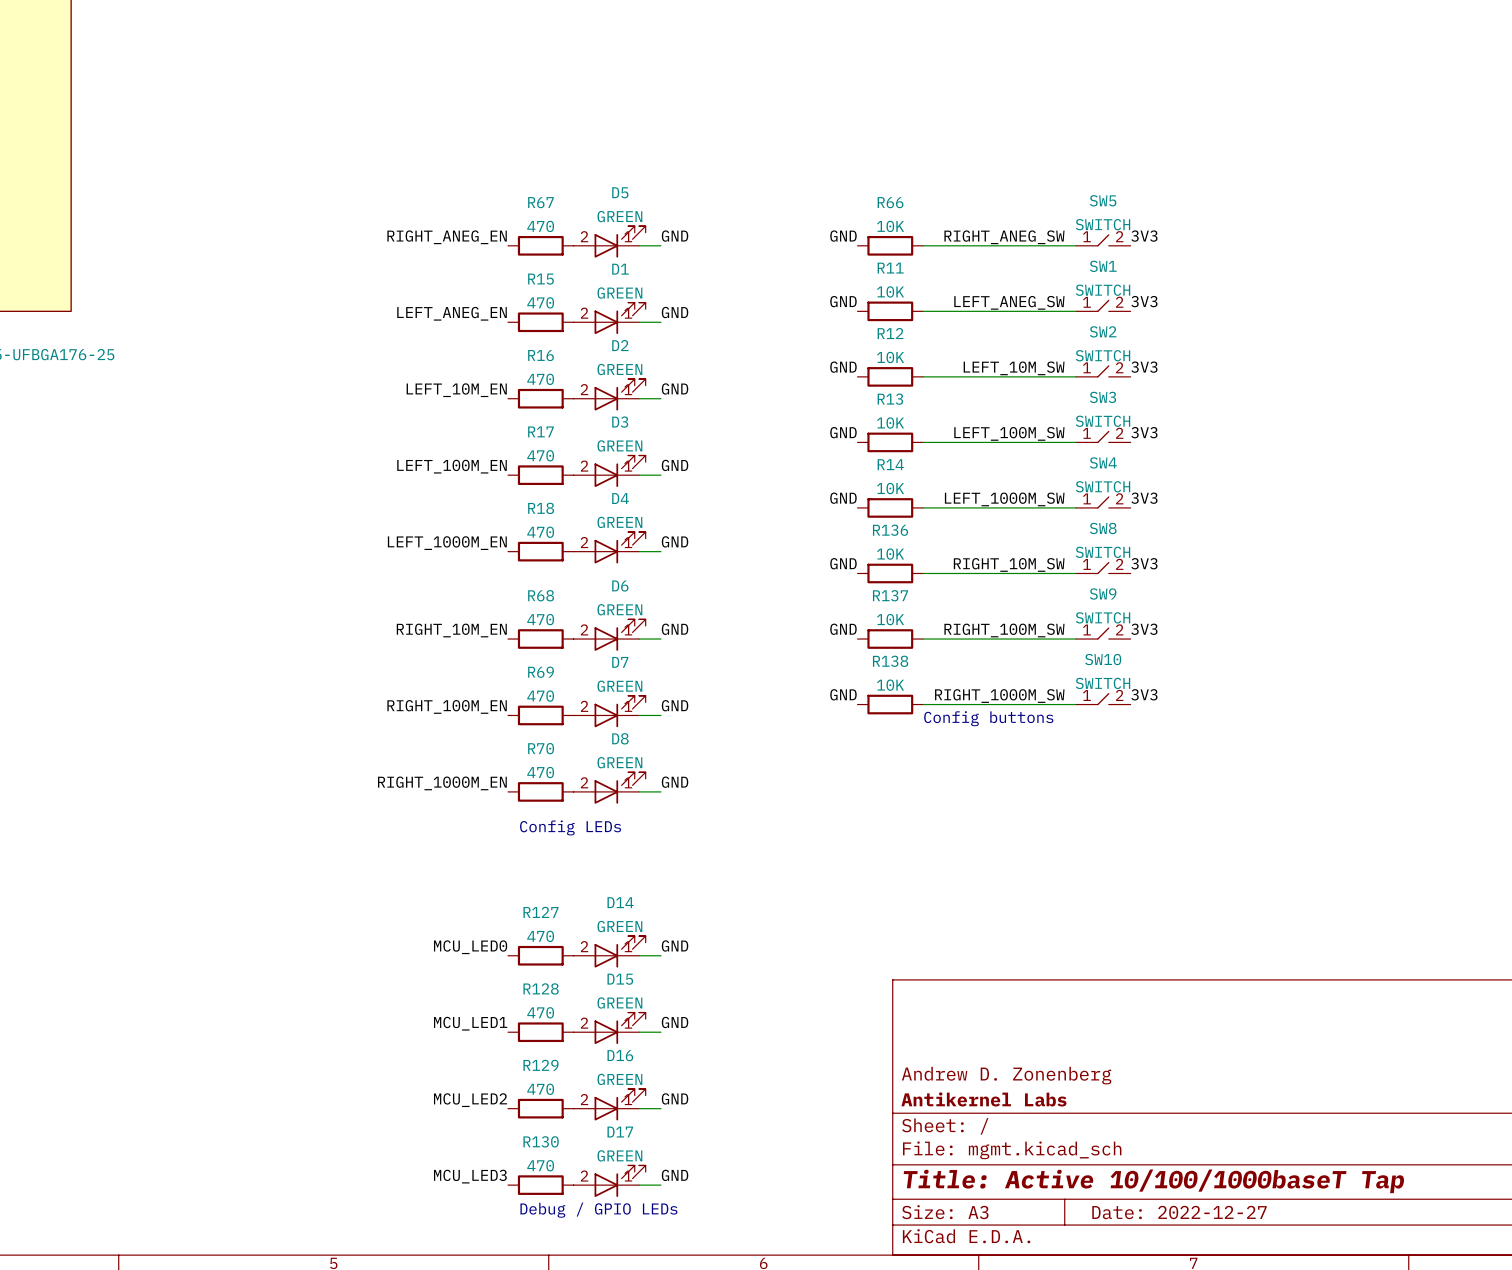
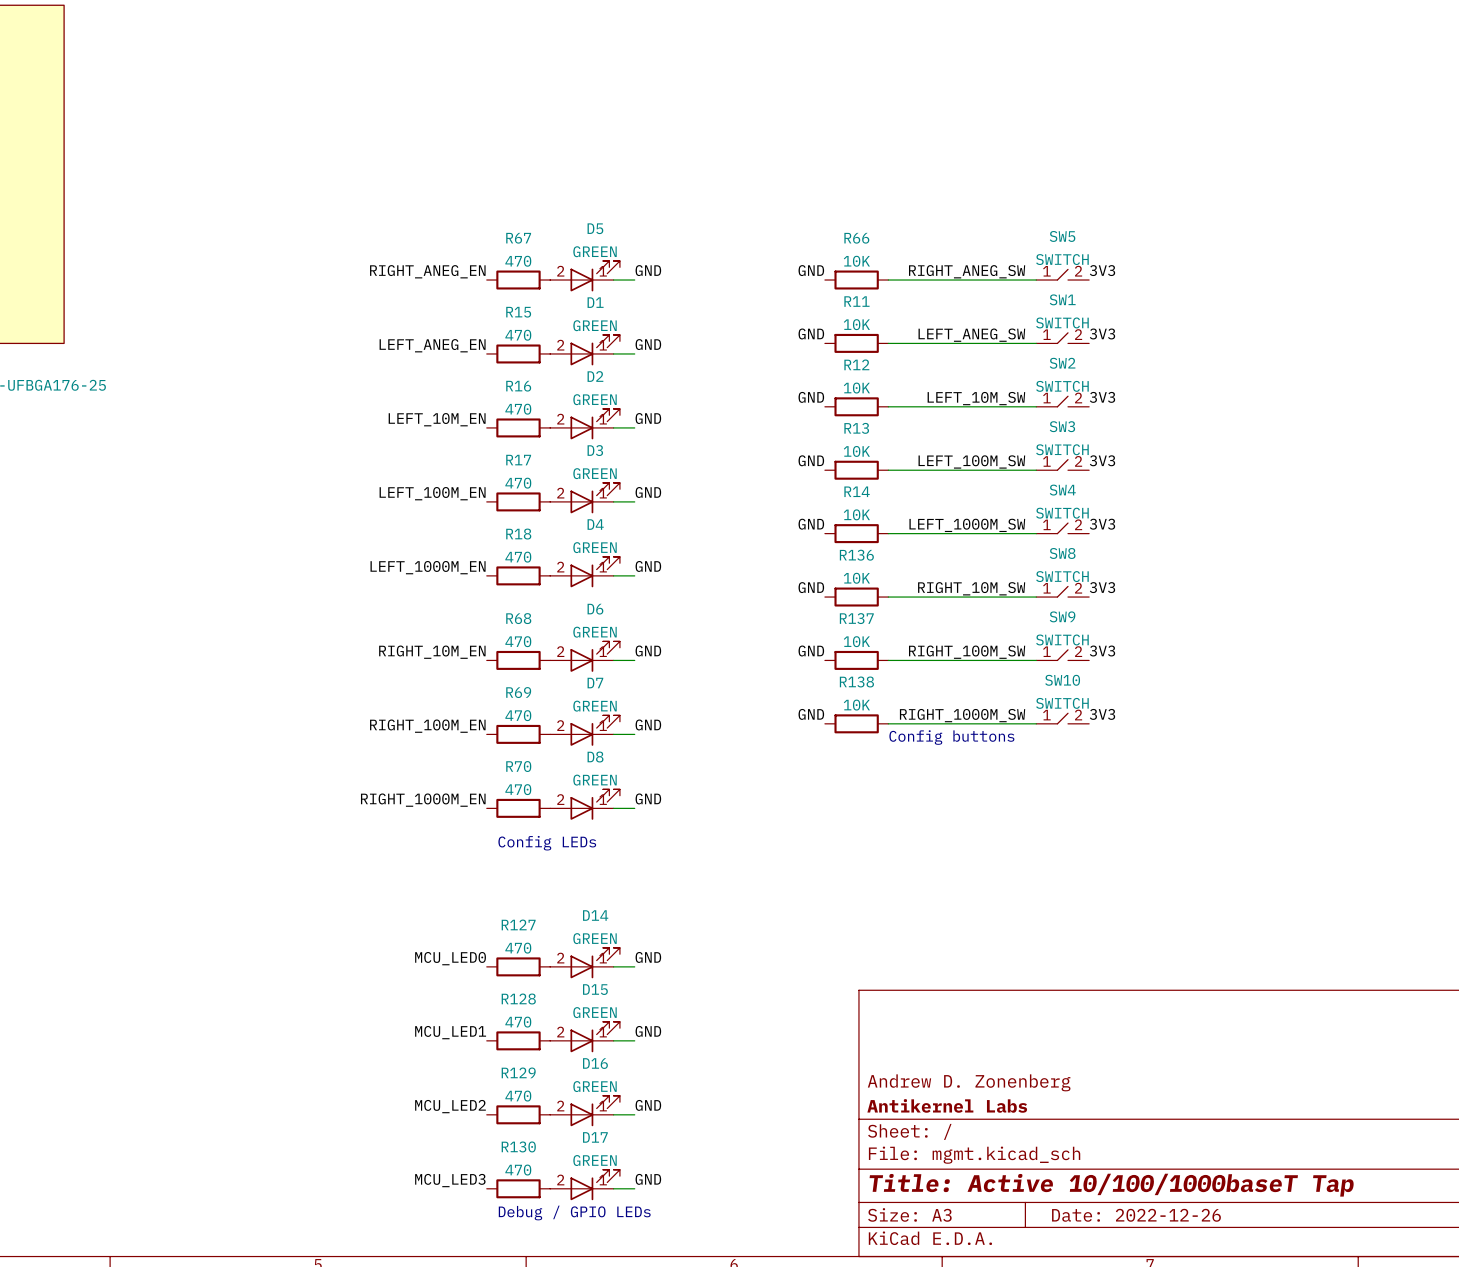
title block: Date: 2022-12-27 (1179, 1212) -> Date: 2022-12-26 (1136, 1215)

